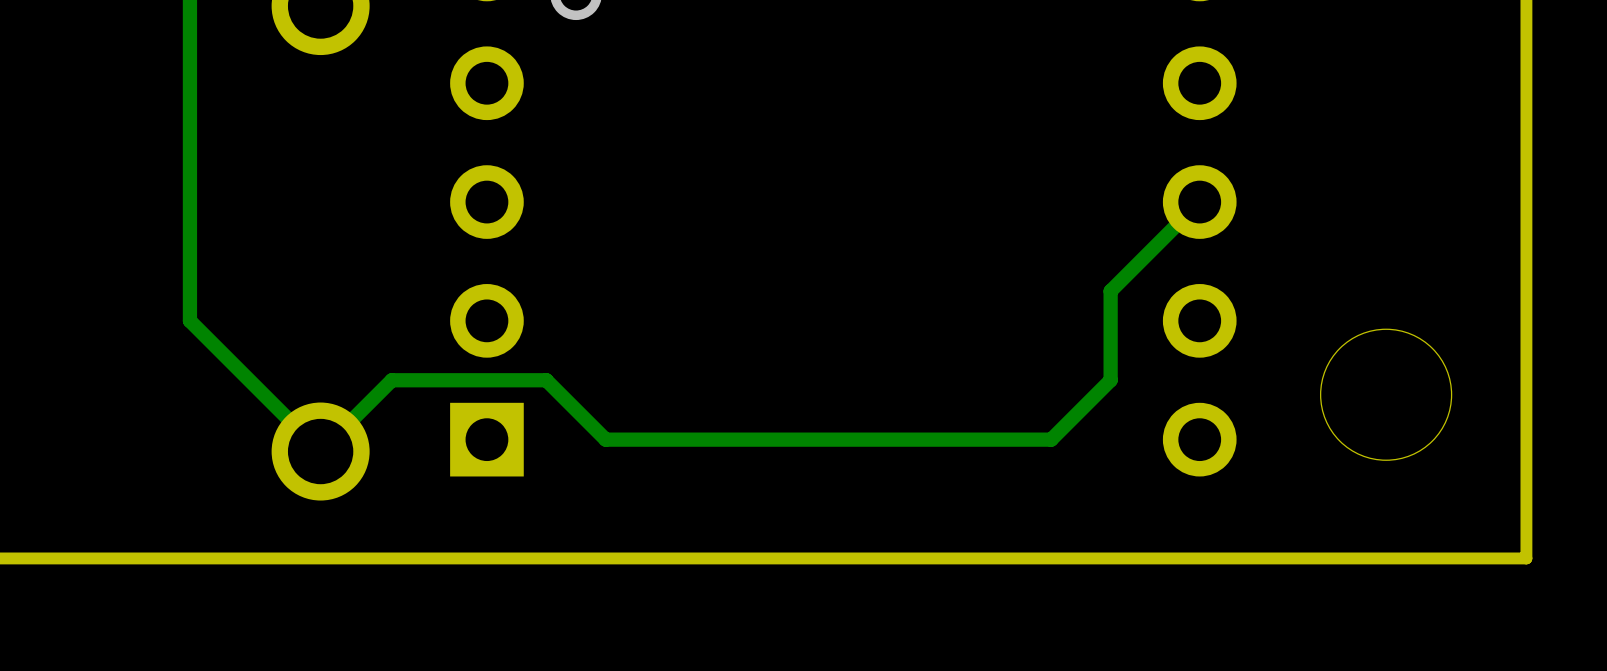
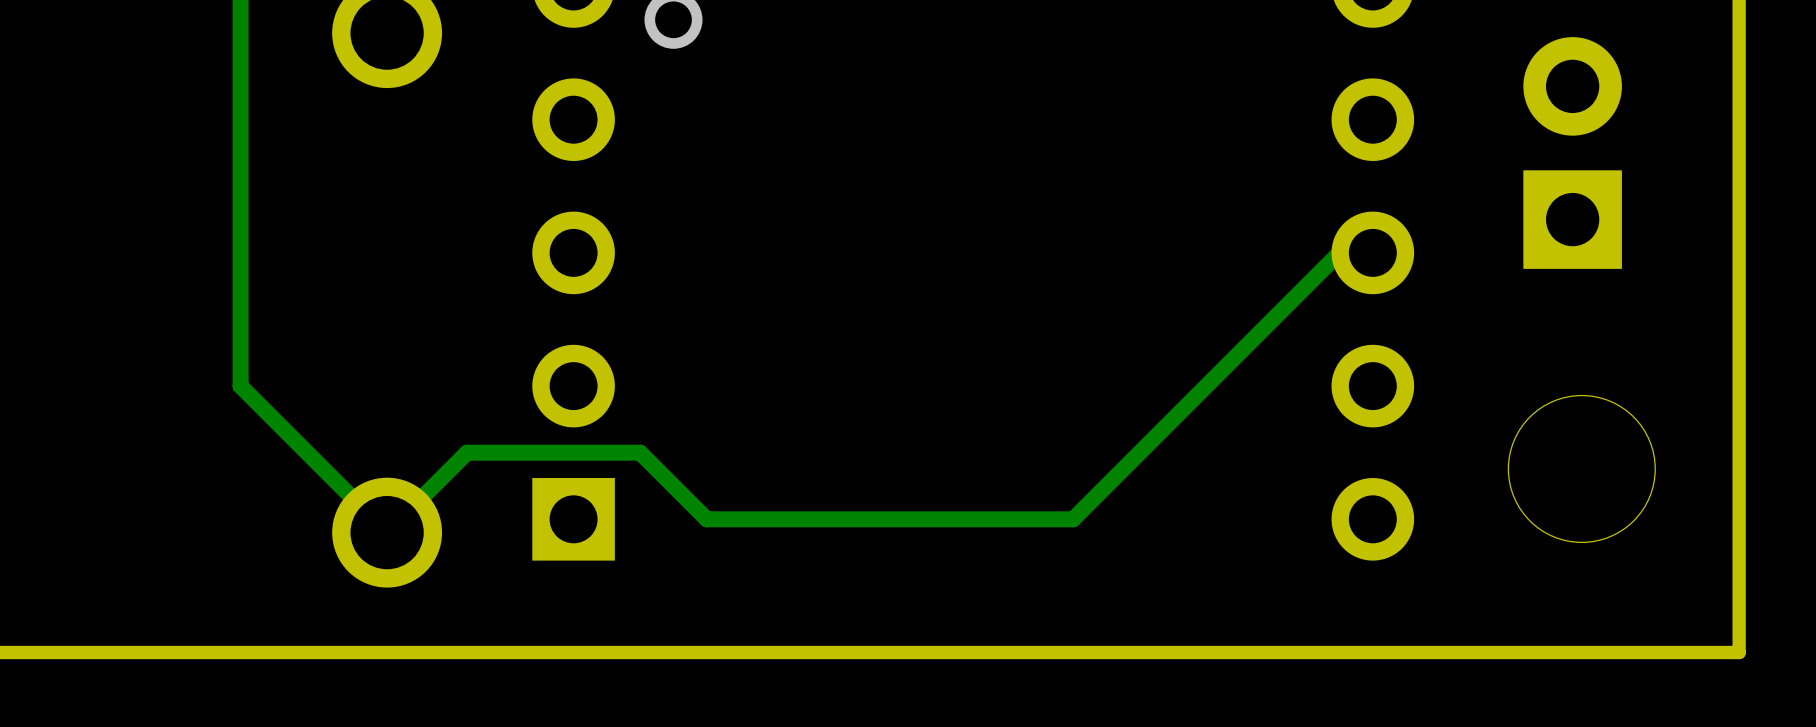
part: none -> (1572, 152)
track: (1199, 202) (1110, 291) (1110, 380) (1051, 439) (932, 439) -> (1372, 252) (1339, 252) (1073, 519)

